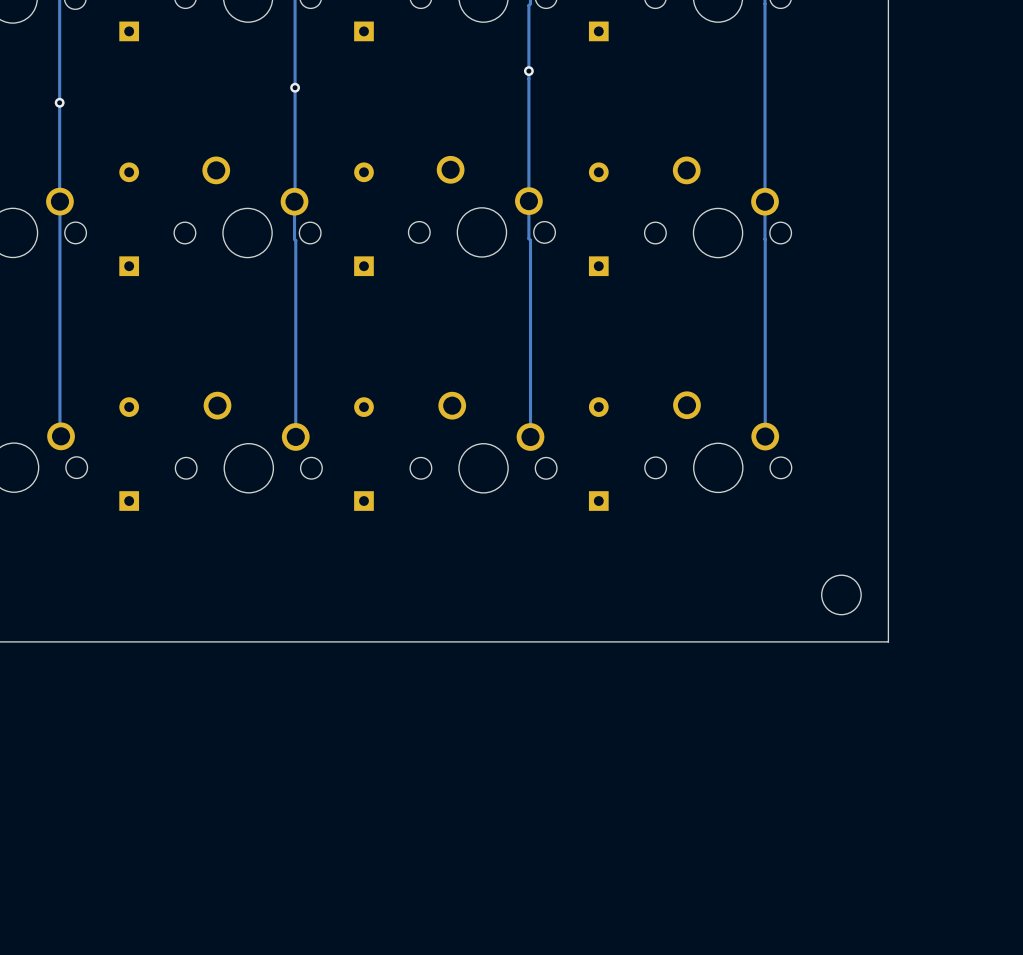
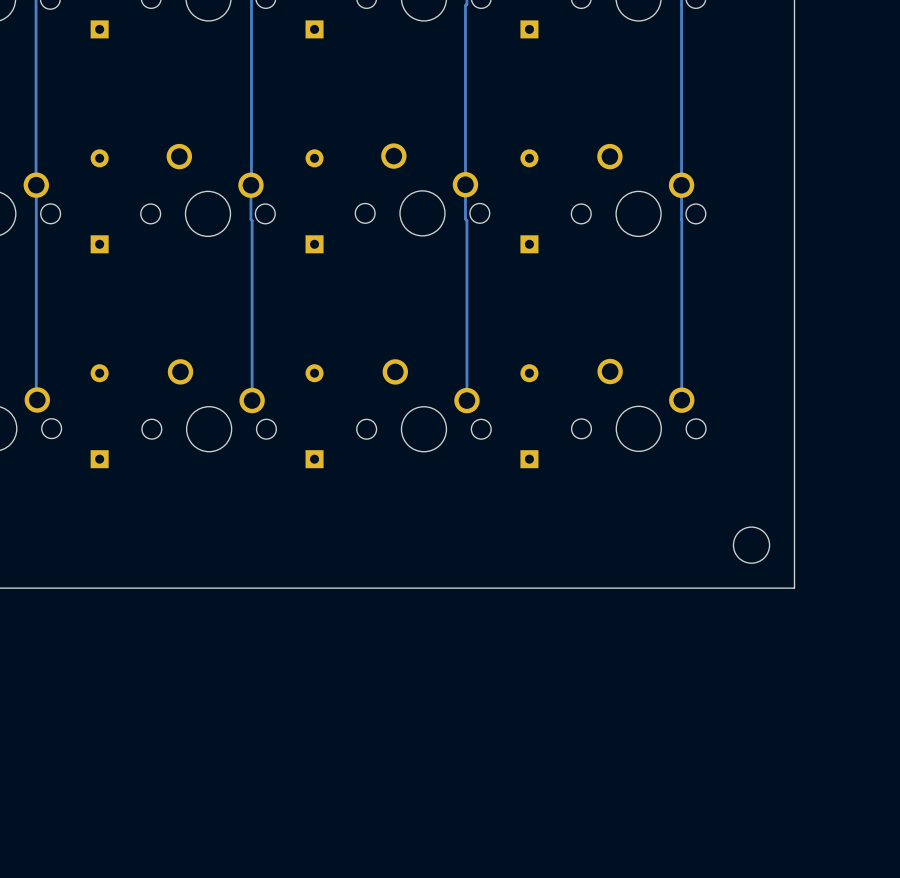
via: (528, 71) -> none
via: (295, 87) -> none
via: (59, 102) -> none

